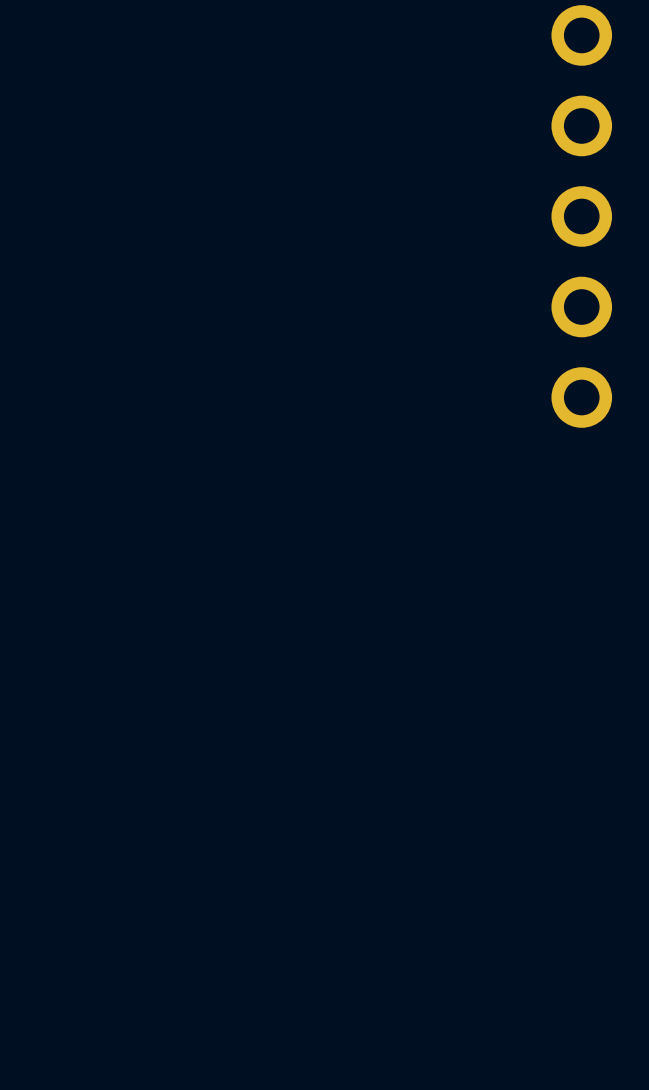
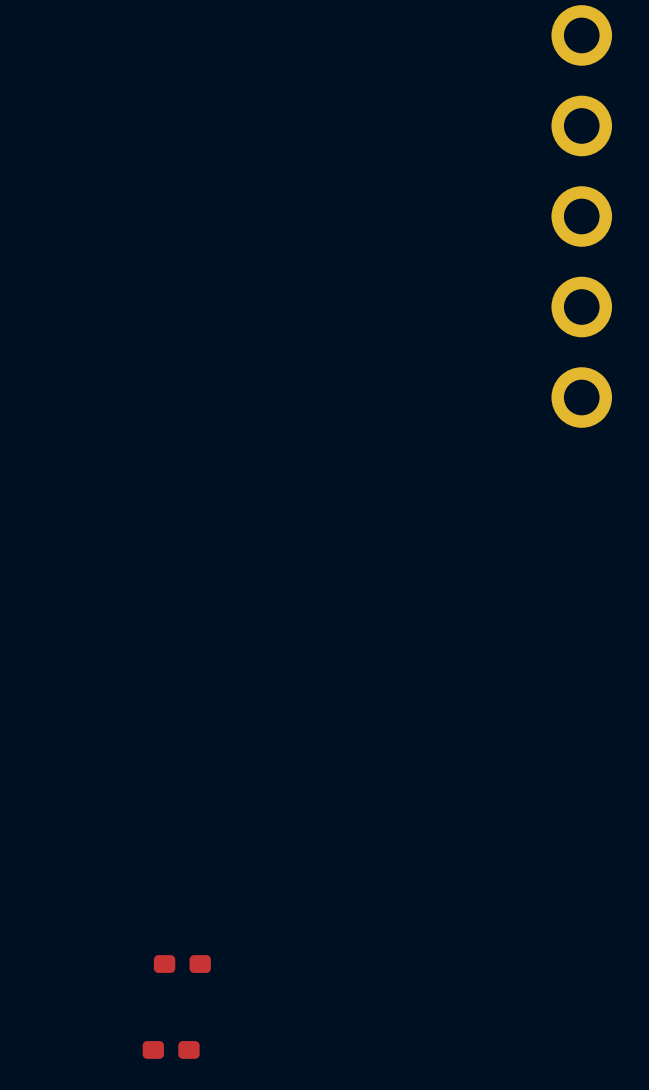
part: none -> (182, 964)
part: none -> (171, 1049)

